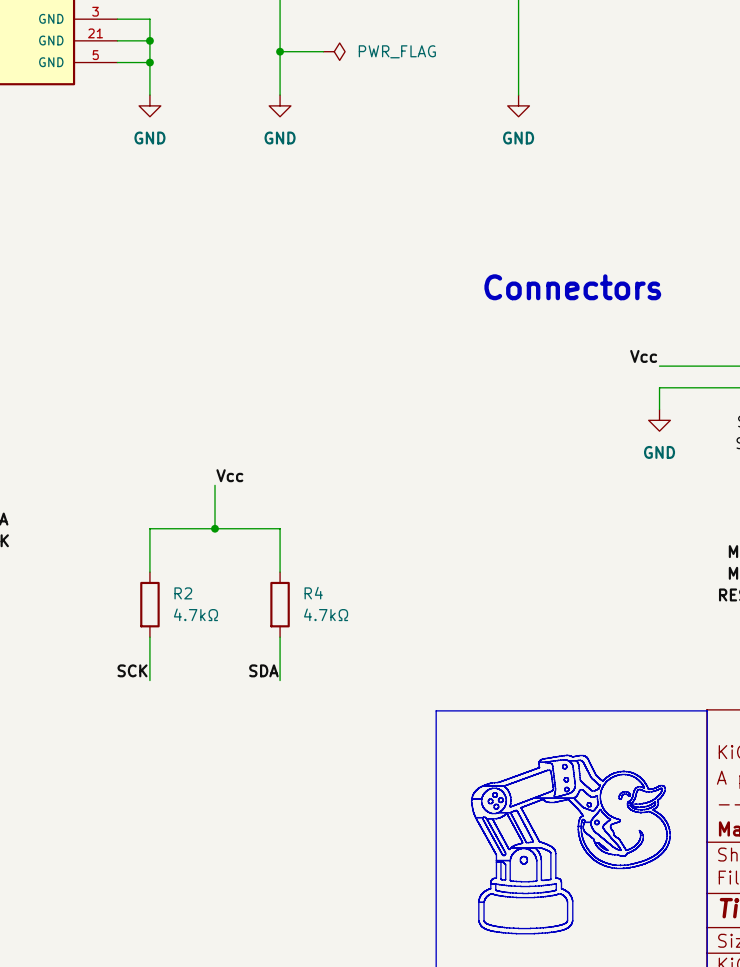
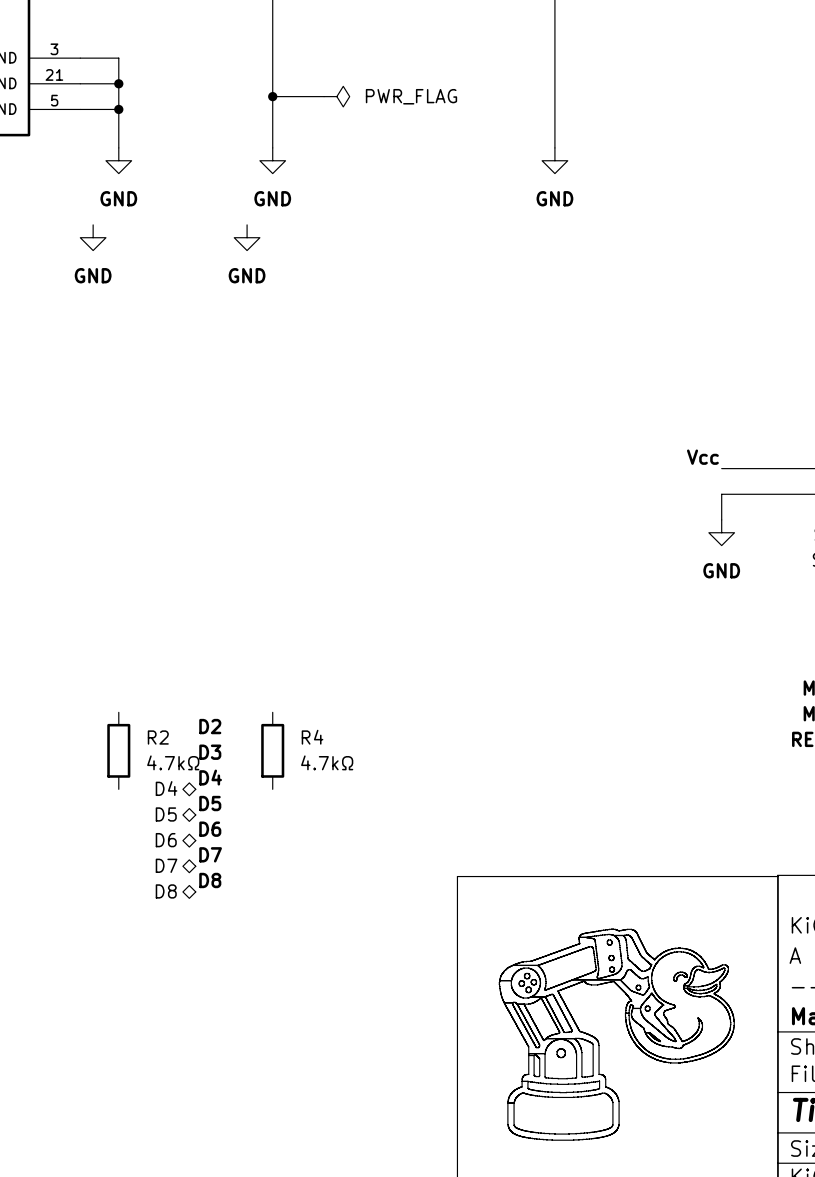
power symbol: none -> GND (93, 237)
power symbol: none -> GND (247, 237)
text: Connectors (572, 287) -> none
label: Vcc (229, 475) -> none
wire: (215, 485) (215, 528) -> none
junction: (215, 528) -> none
wire: (149, 572) (149, 528) (280, 528) (280, 572) -> none
label: none -> D2 (210, 726)
label: none -> D3 (210, 752)
label: none -> D4 (210, 777)
sheet pin: none -> D4 (166, 788)
wire: (149, 637) (149, 680) -> none
wire: (280, 637) (280, 680) -> none
label: none -> D5 (210, 803)
sheet pin: none -> D5 (166, 814)
label: SCK (132, 670) -> none
label: none -> D6 (210, 829)
label: SDA (263, 670) -> none
sheet pin: none -> D6 (166, 840)
label: none -> D7 (210, 854)
sheet pin: none -> D7 (166, 865)
label: none -> D8 (210, 880)
sheet pin: none -> D8 (166, 891)

